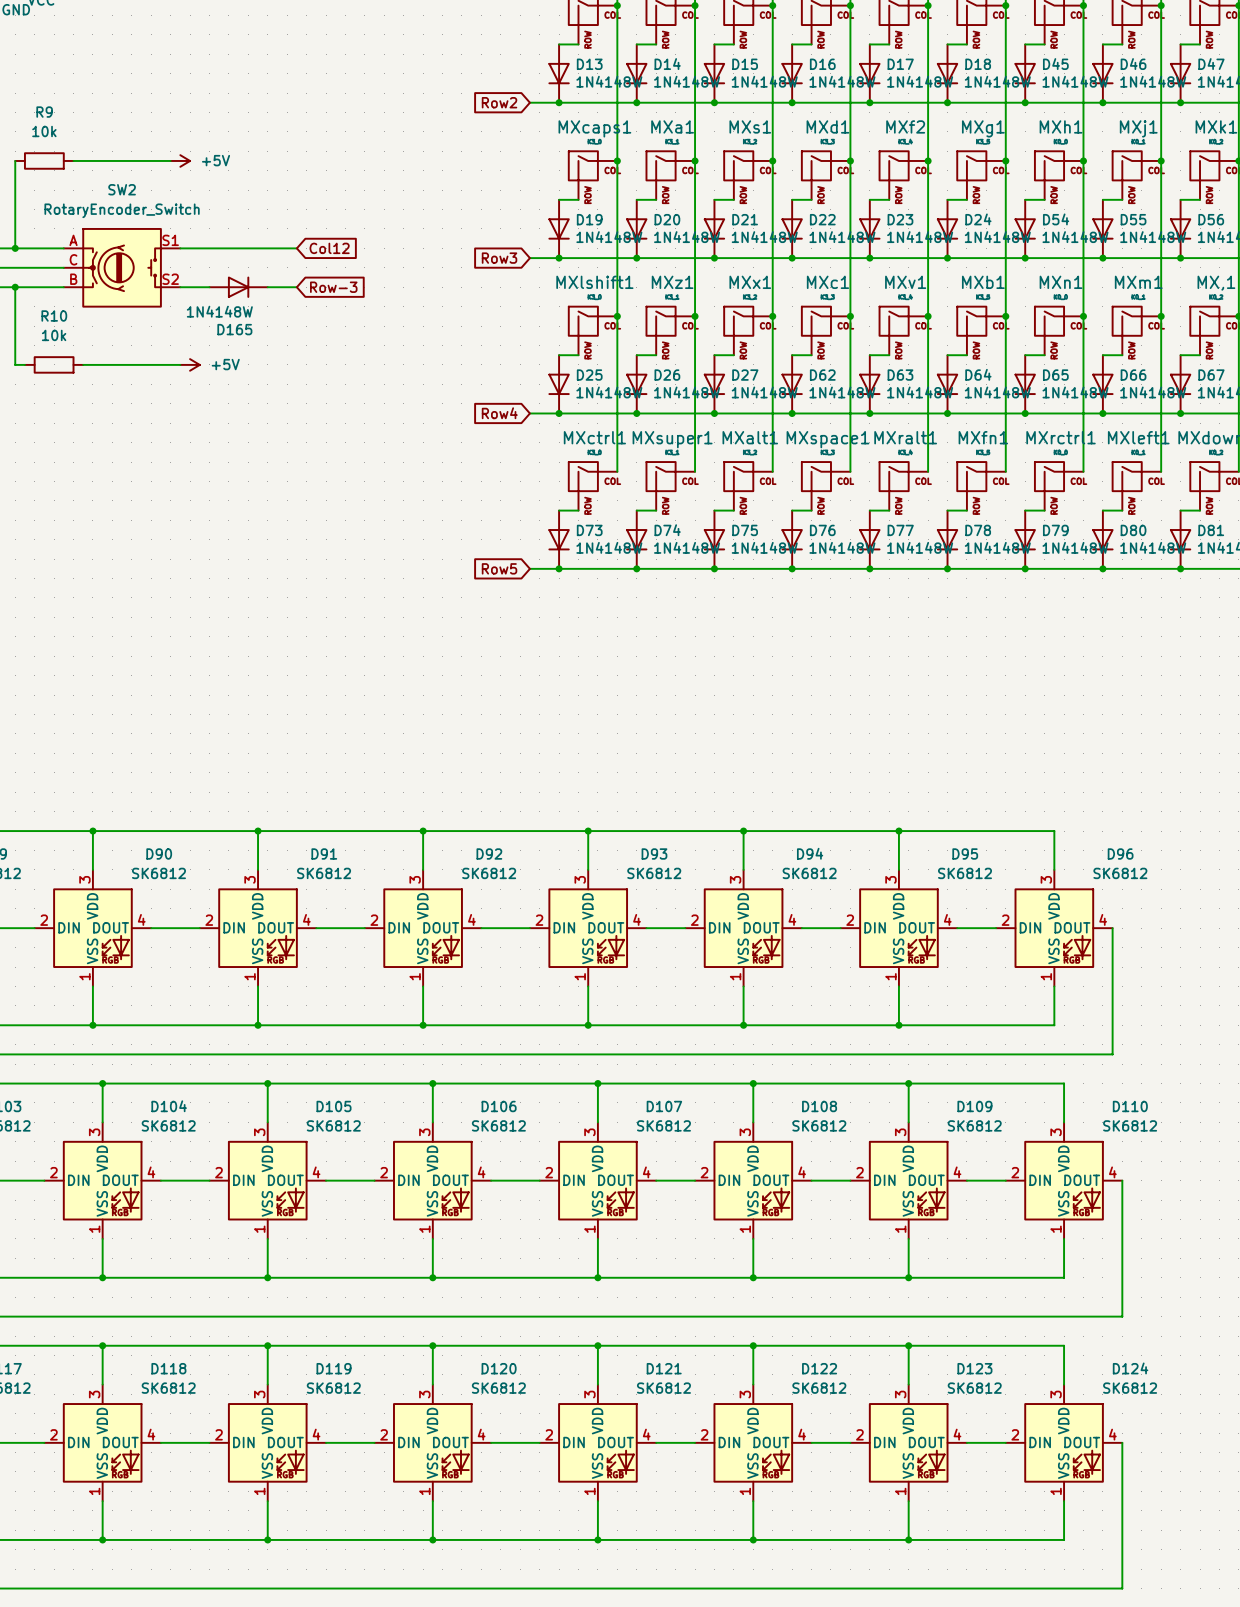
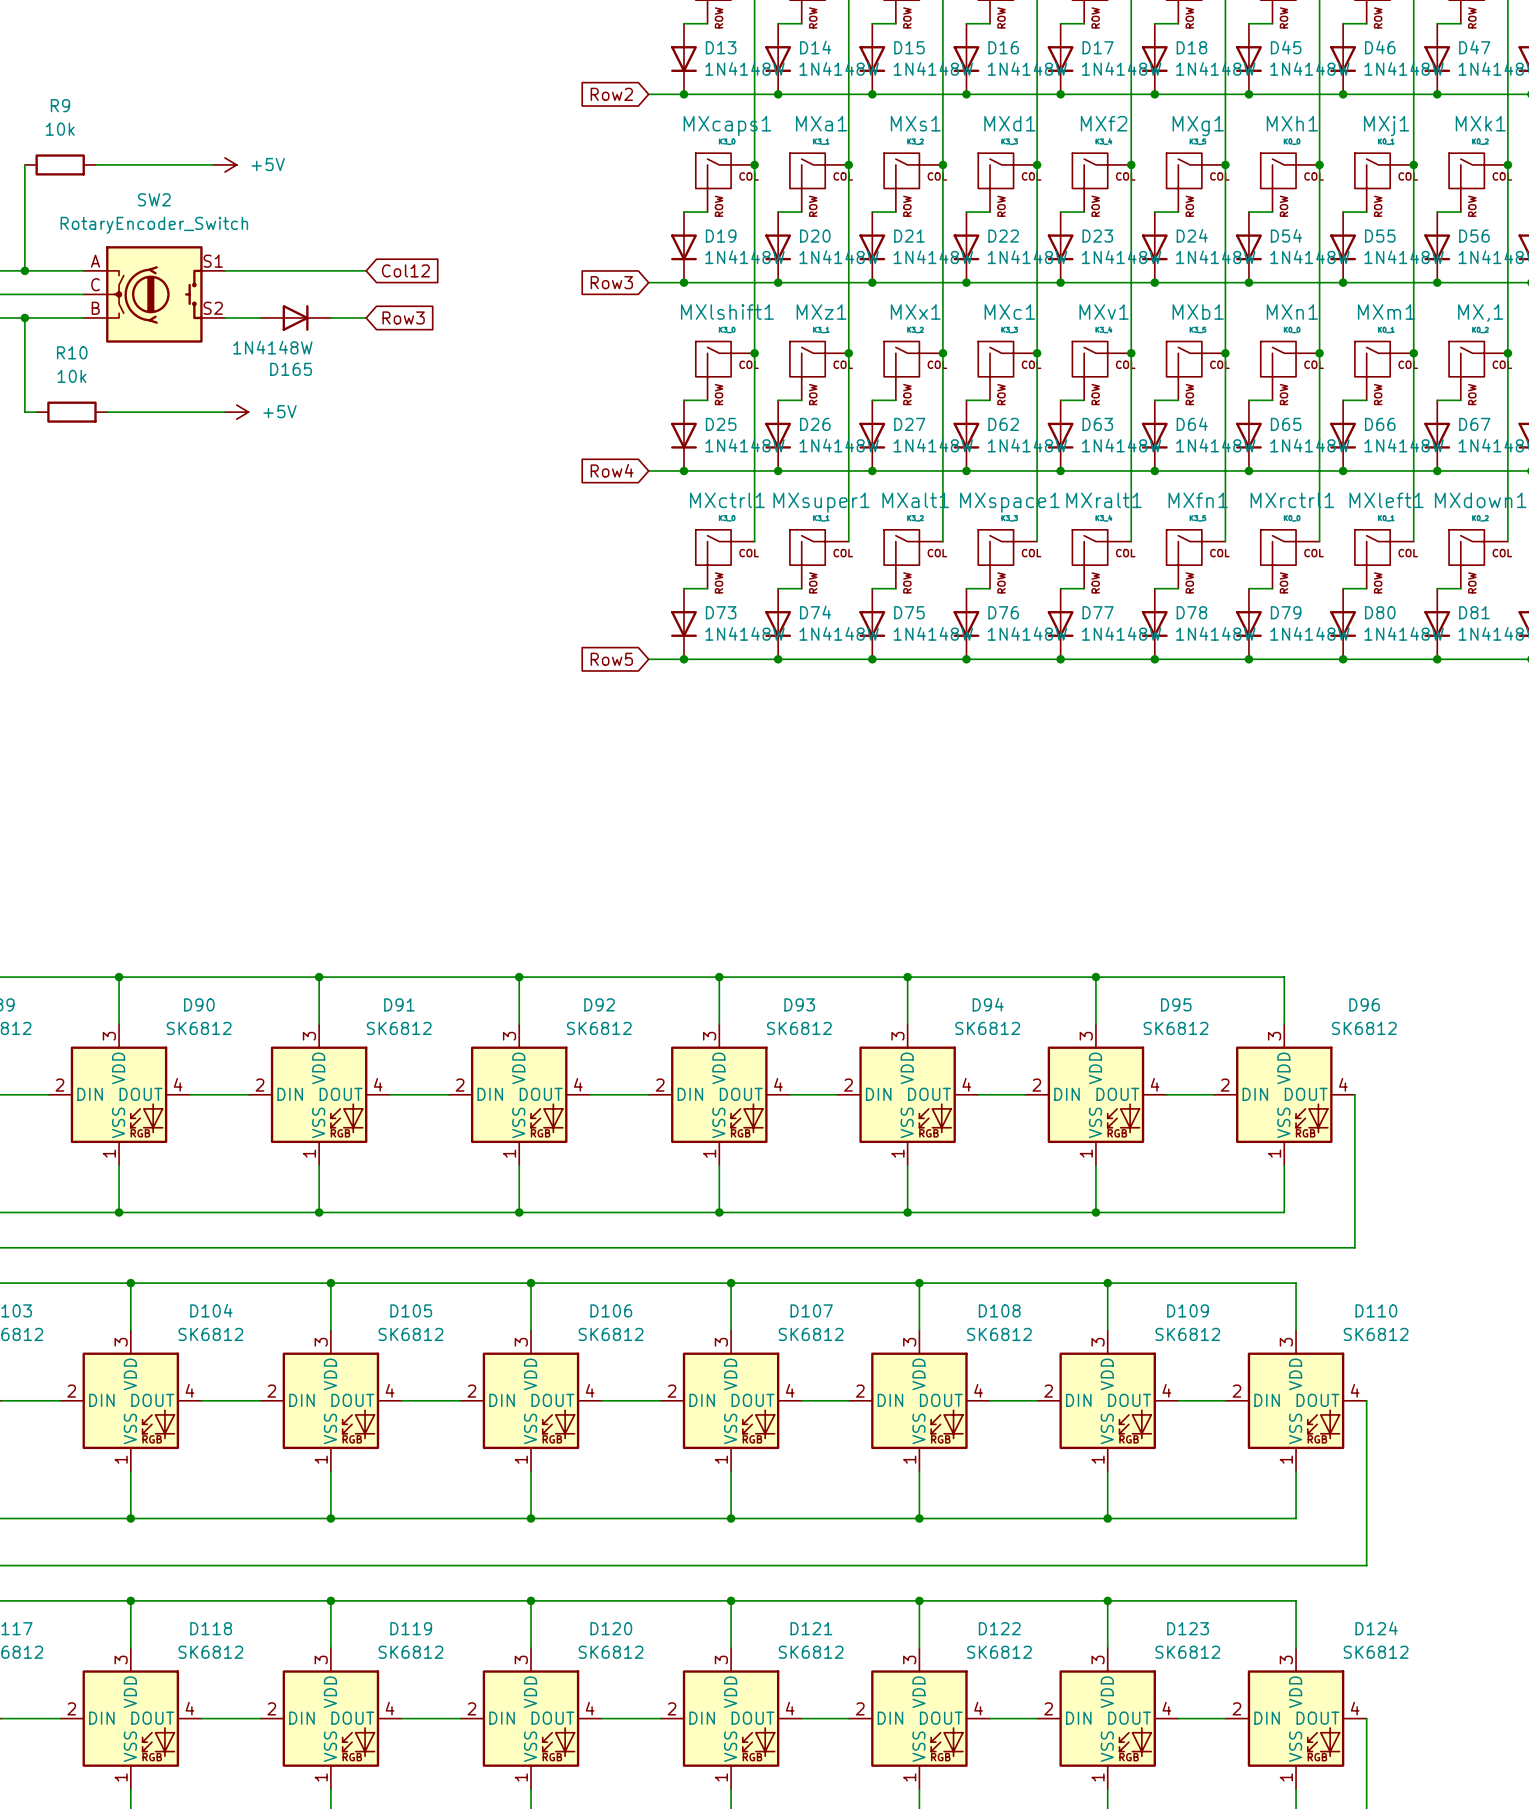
global label: Row-3 (333, 287) -> Row3 (403, 317)

